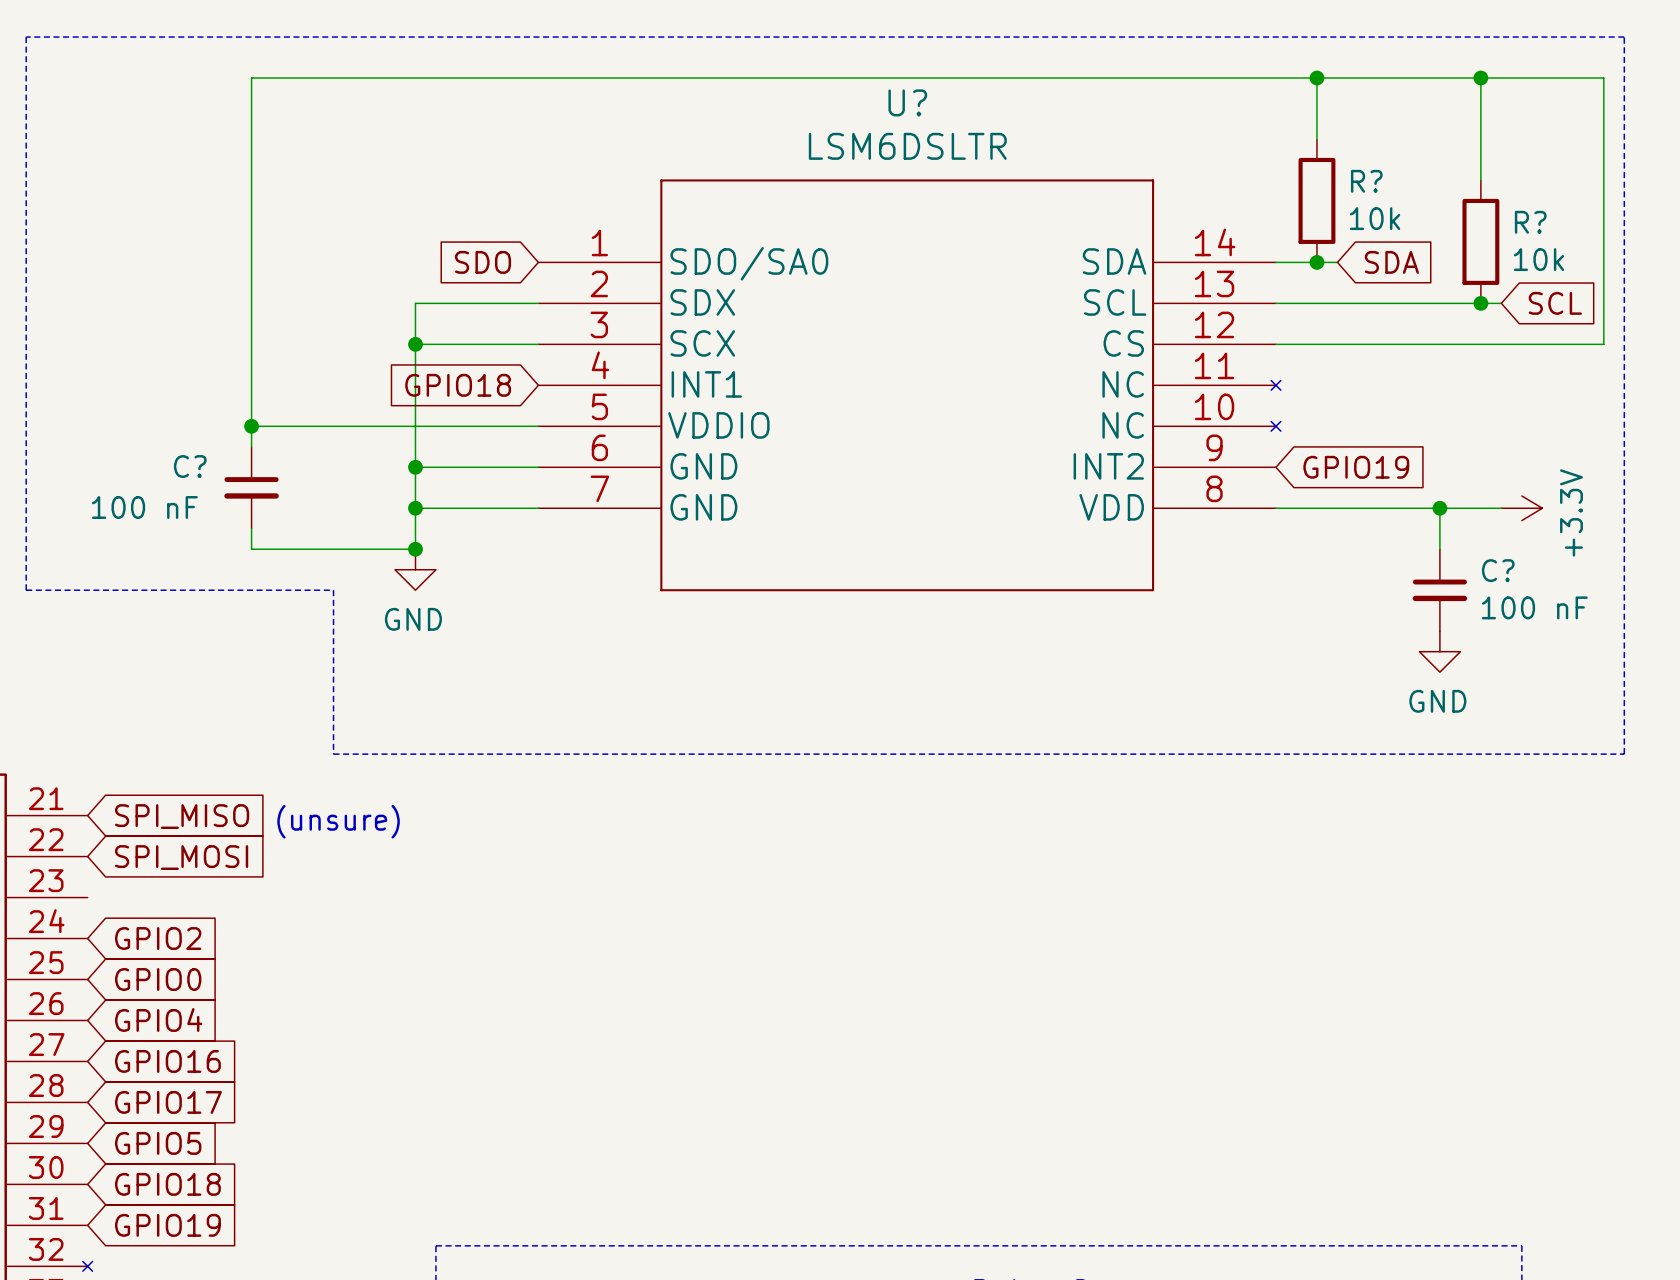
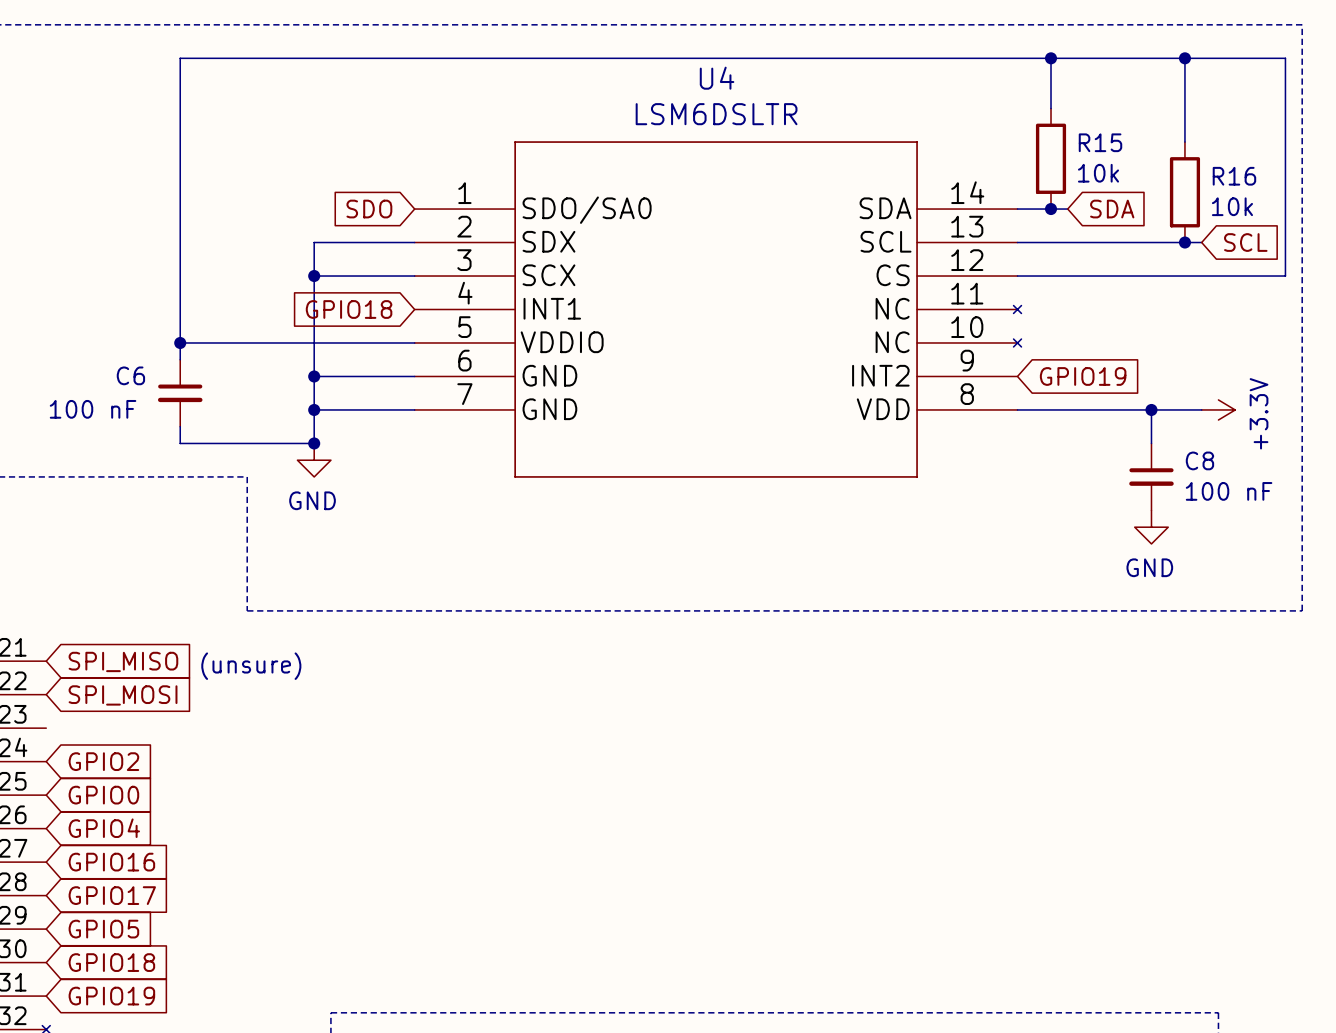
U? name: U? (907, 102) -> U4 (717, 78)
R? name: R? (1366, 181) -> R15 (1100, 142)
R? name: R? (1530, 222) -> R16 (1234, 176)
C? name: C? (190, 466) -> C6 (130, 375)
C? name: C? (1498, 570) -> C8 (1199, 460)

